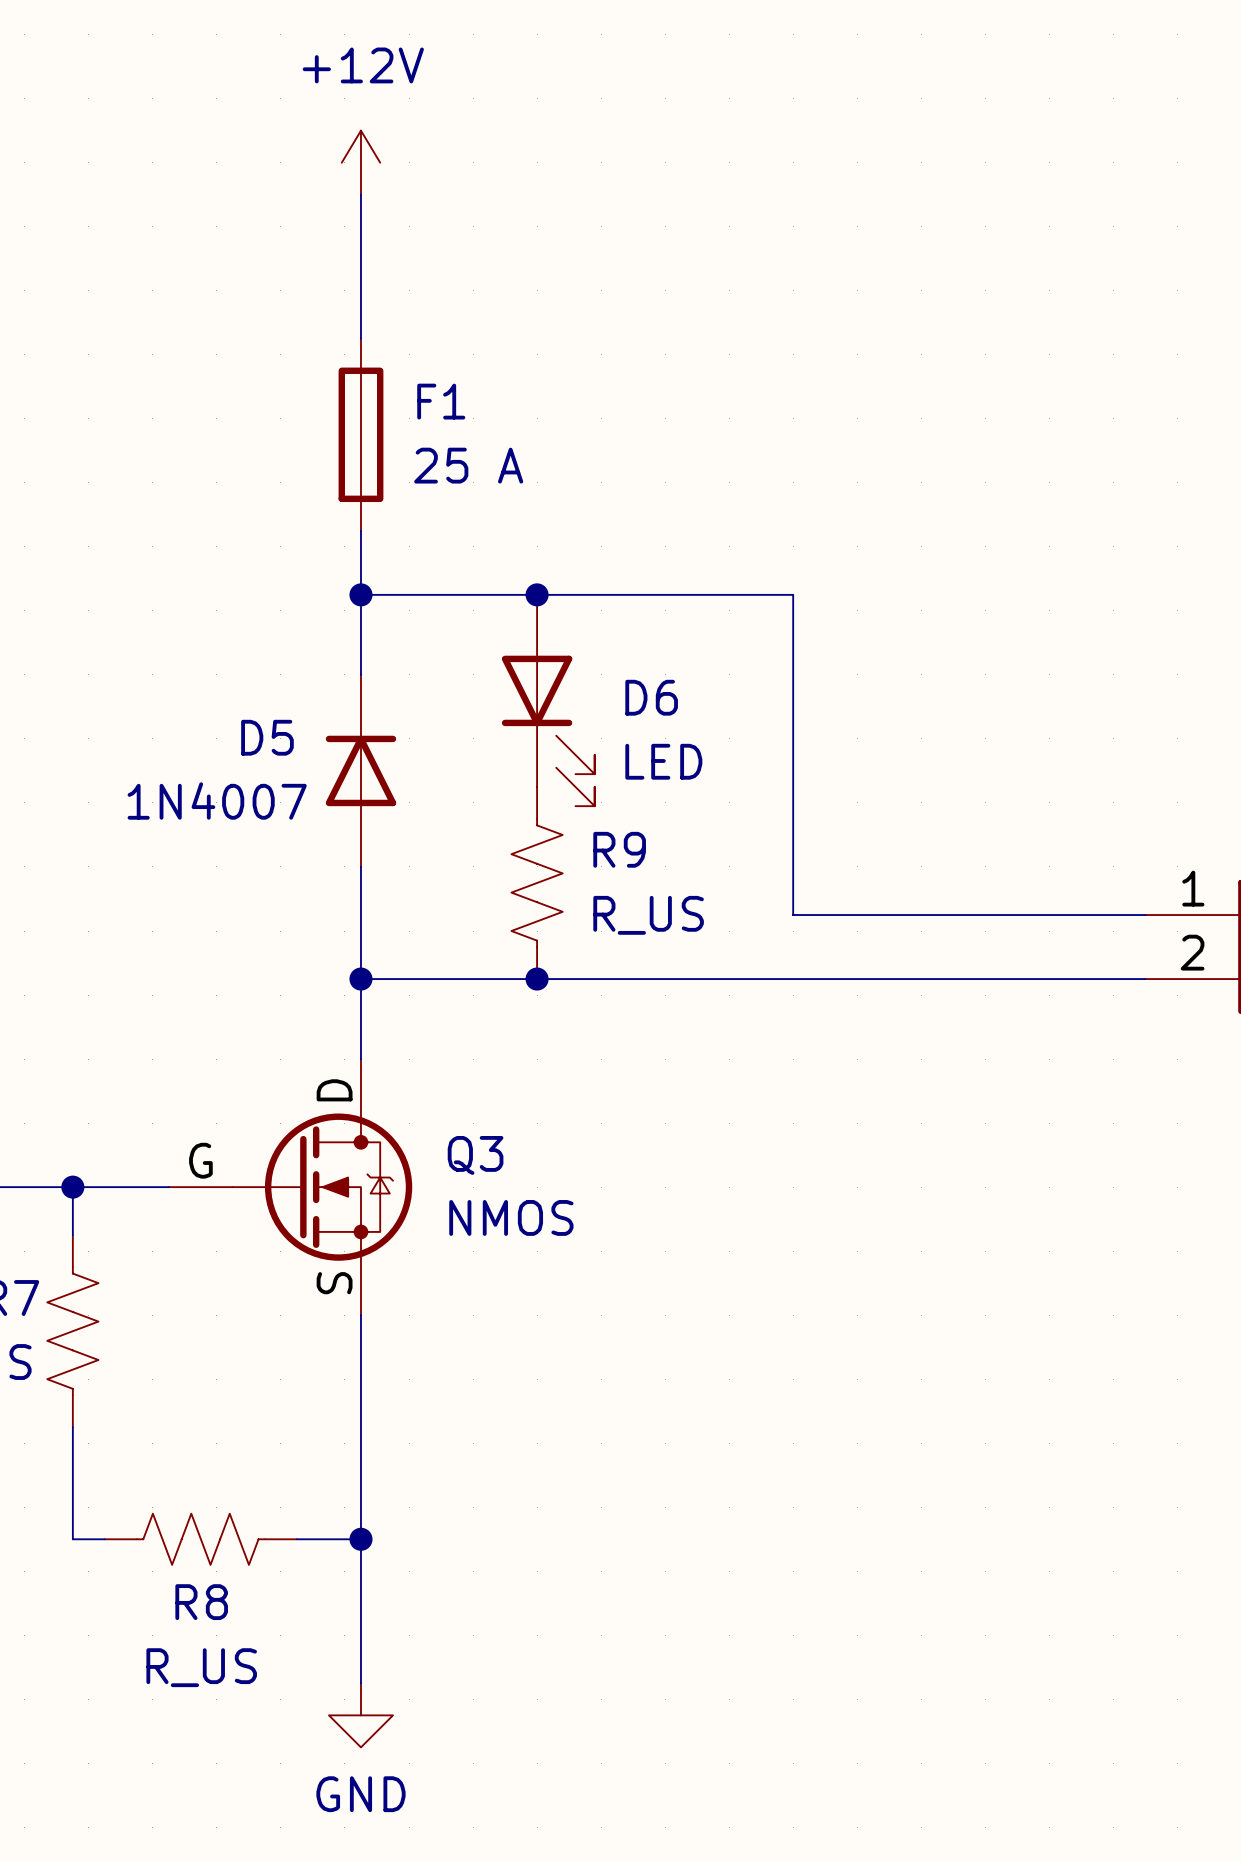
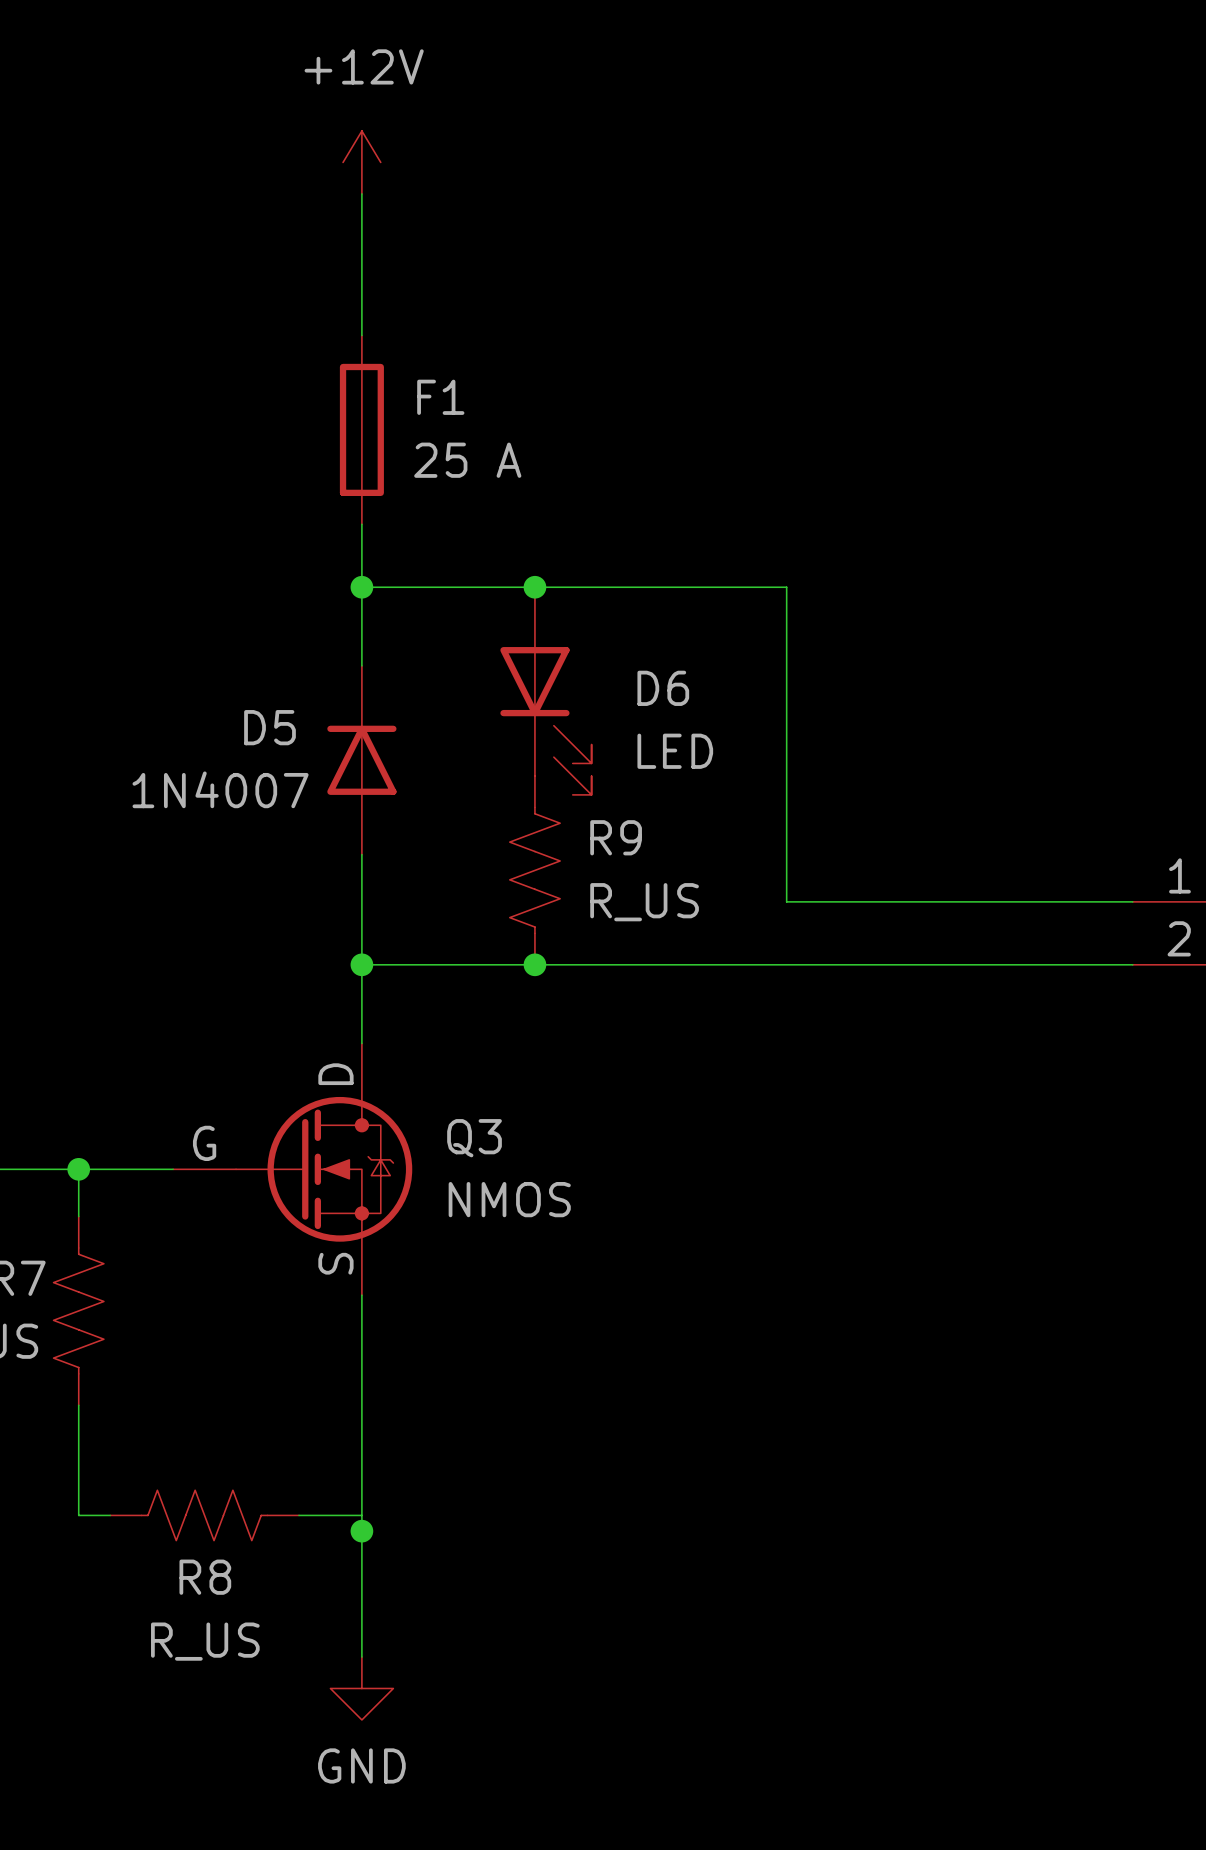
D6 name position: D6 (651, 697) -> D6 (663, 688)
D6 value position: LED (663, 761) -> LED (675, 751)
junction position: (360, 1539) -> (361, 1531)

